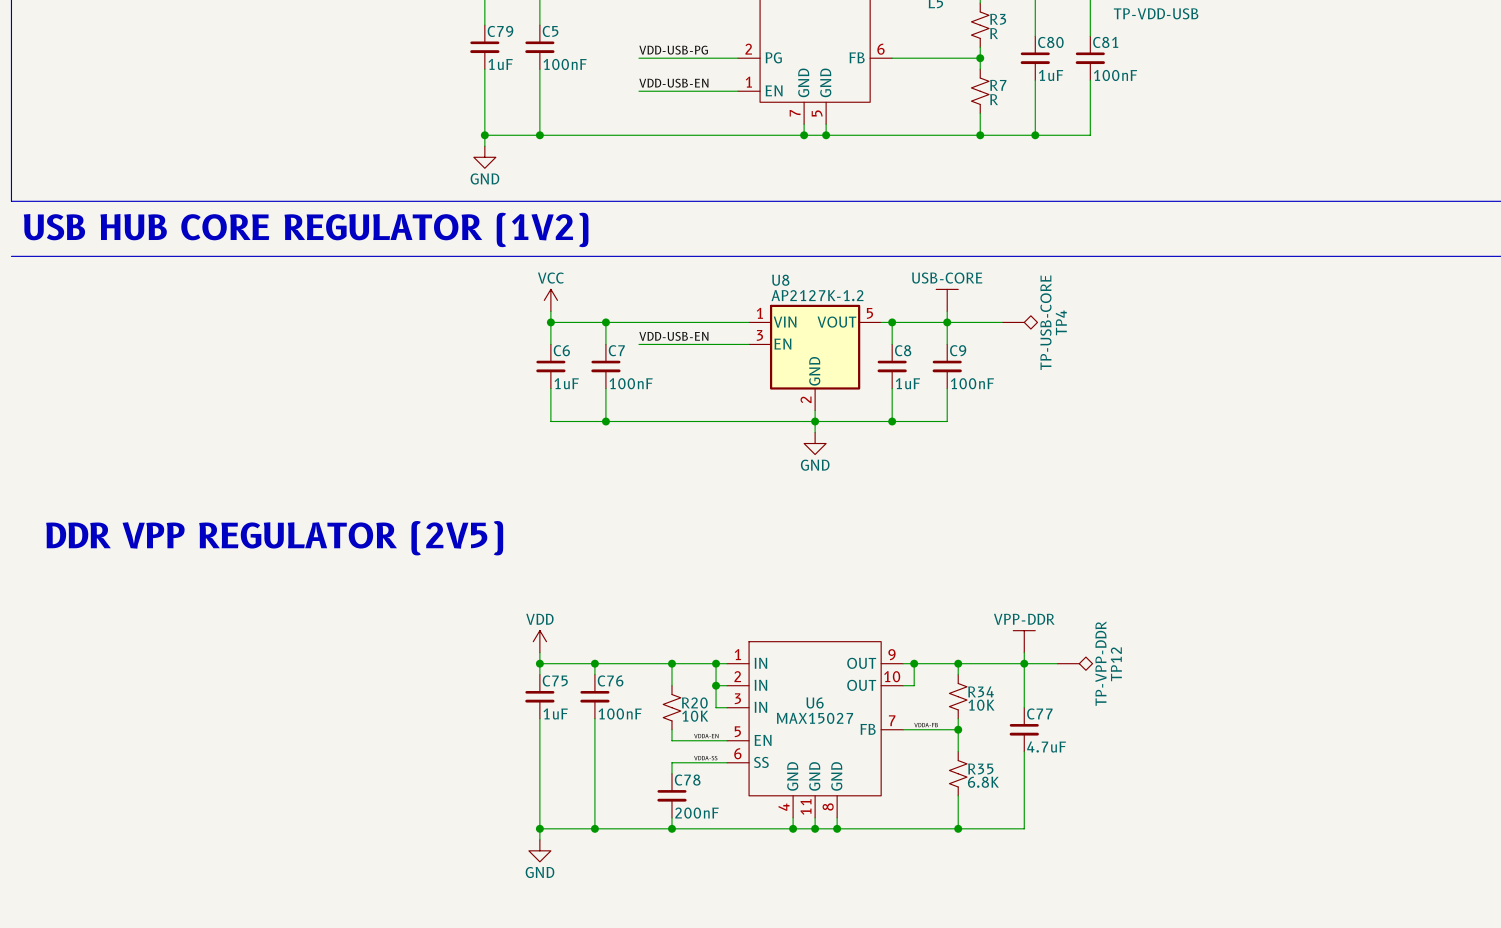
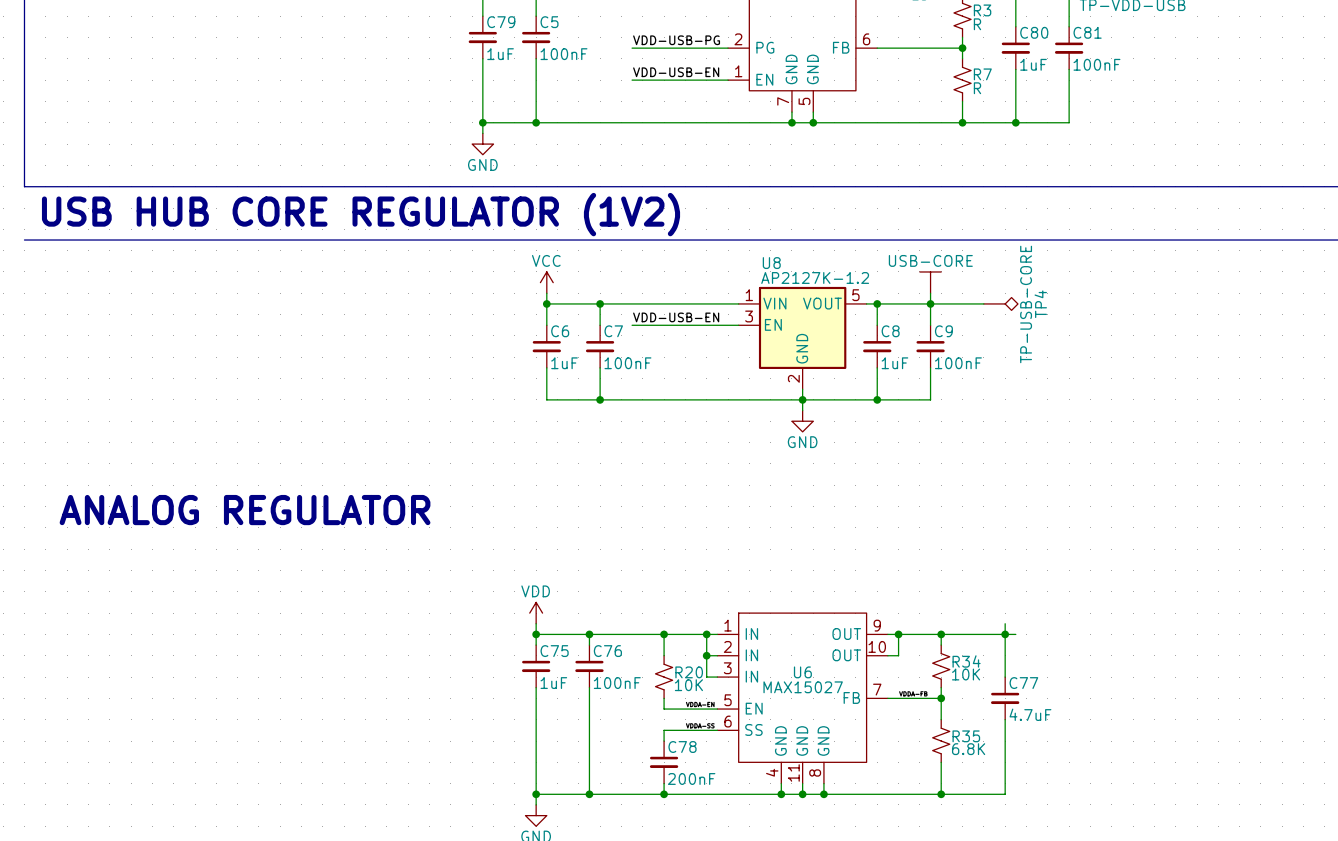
text: DDR VPP REGULATOR (2V5) (274, 538) -> ANALOG REGULATOR (245, 510)
power symbol: VPP-DDR (1024, 641) -> none
wire: (1035, 663) (1057, 663) -> none
TP12: TP-VPP-DDR (1074, 663) -> none

